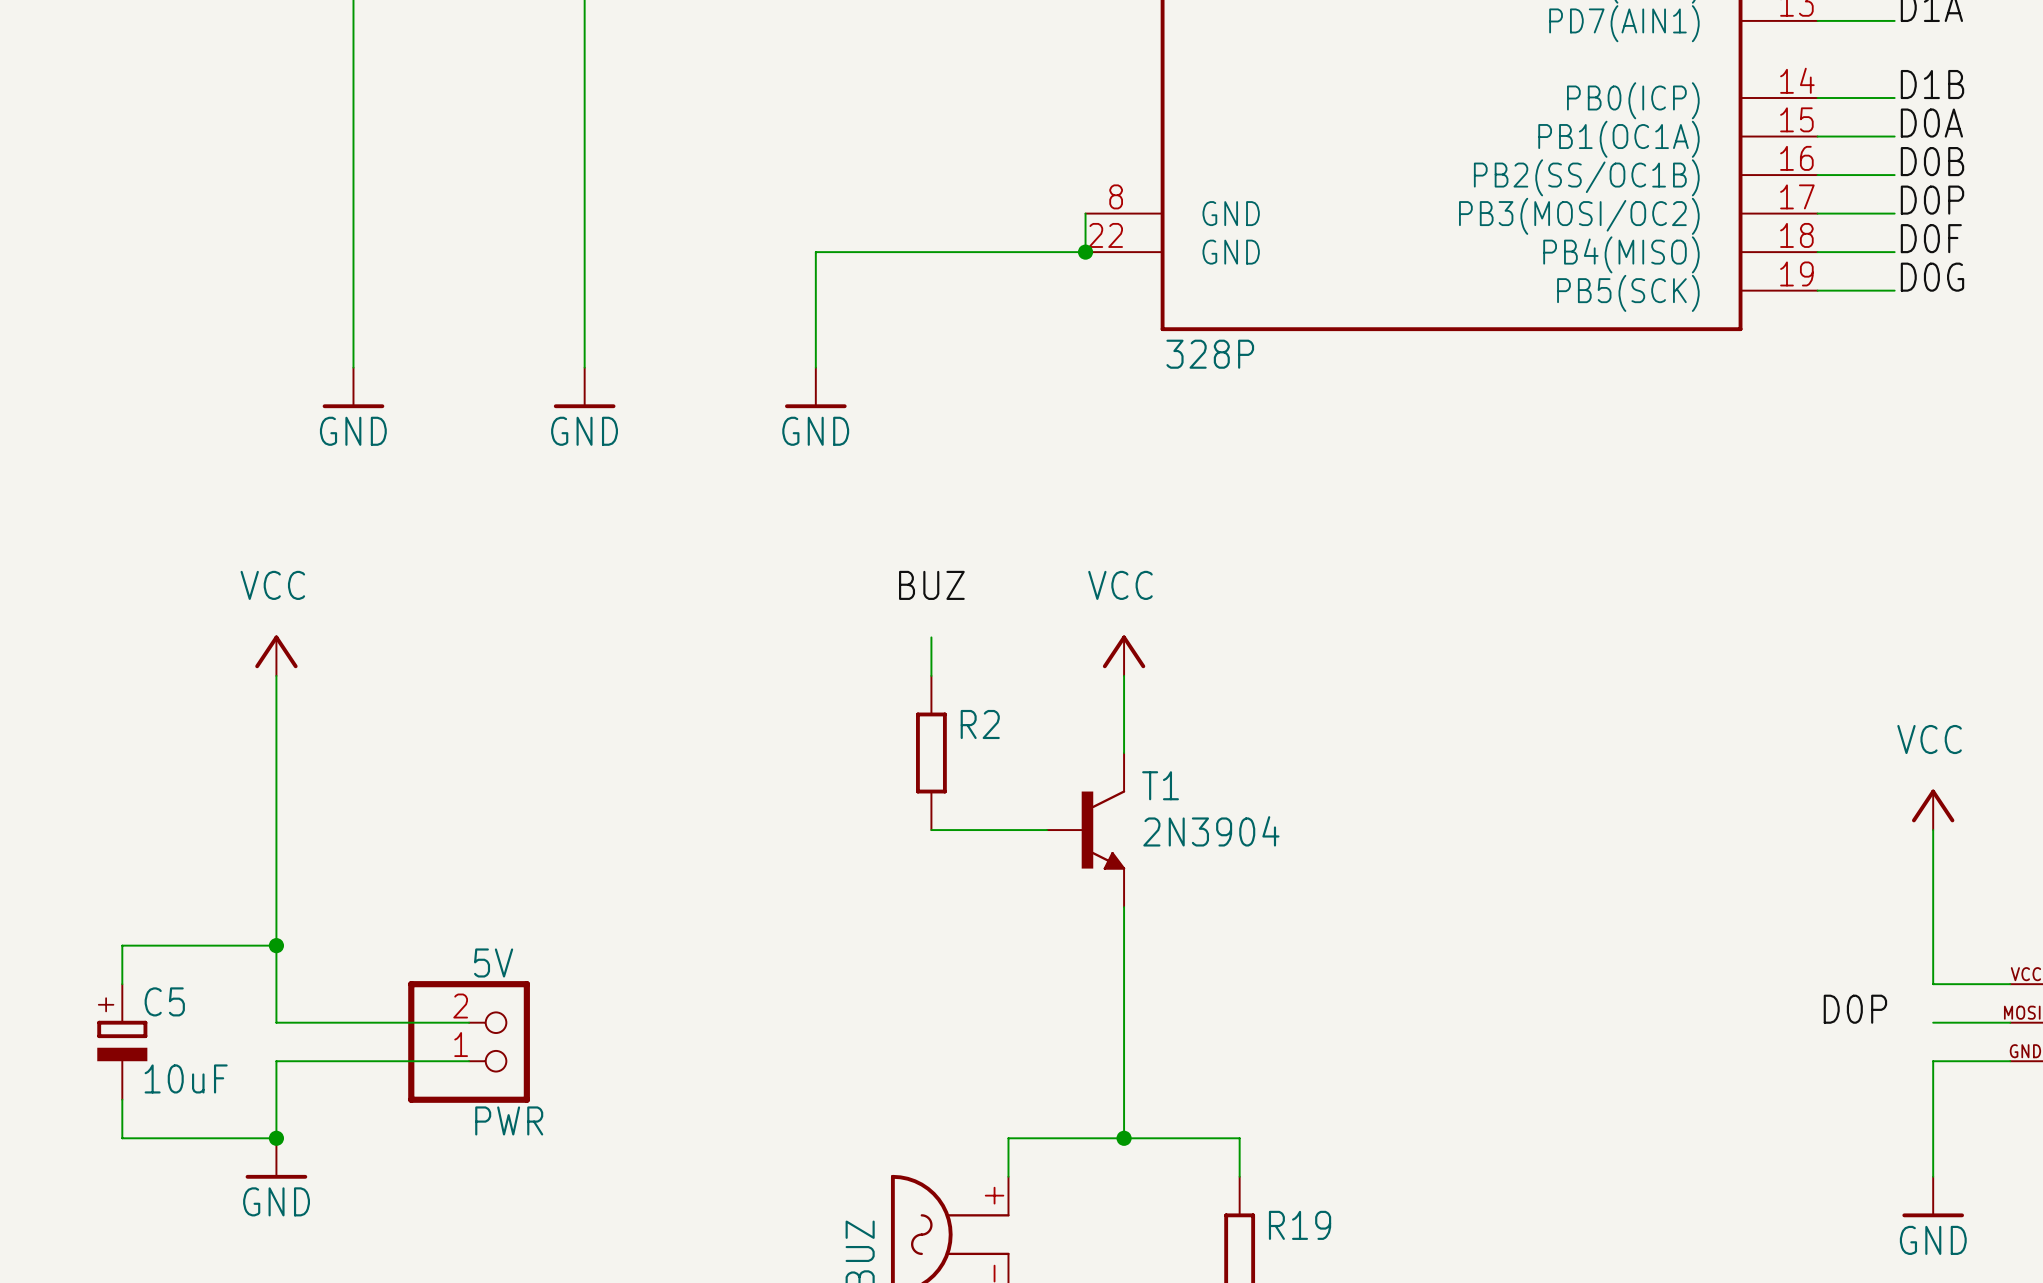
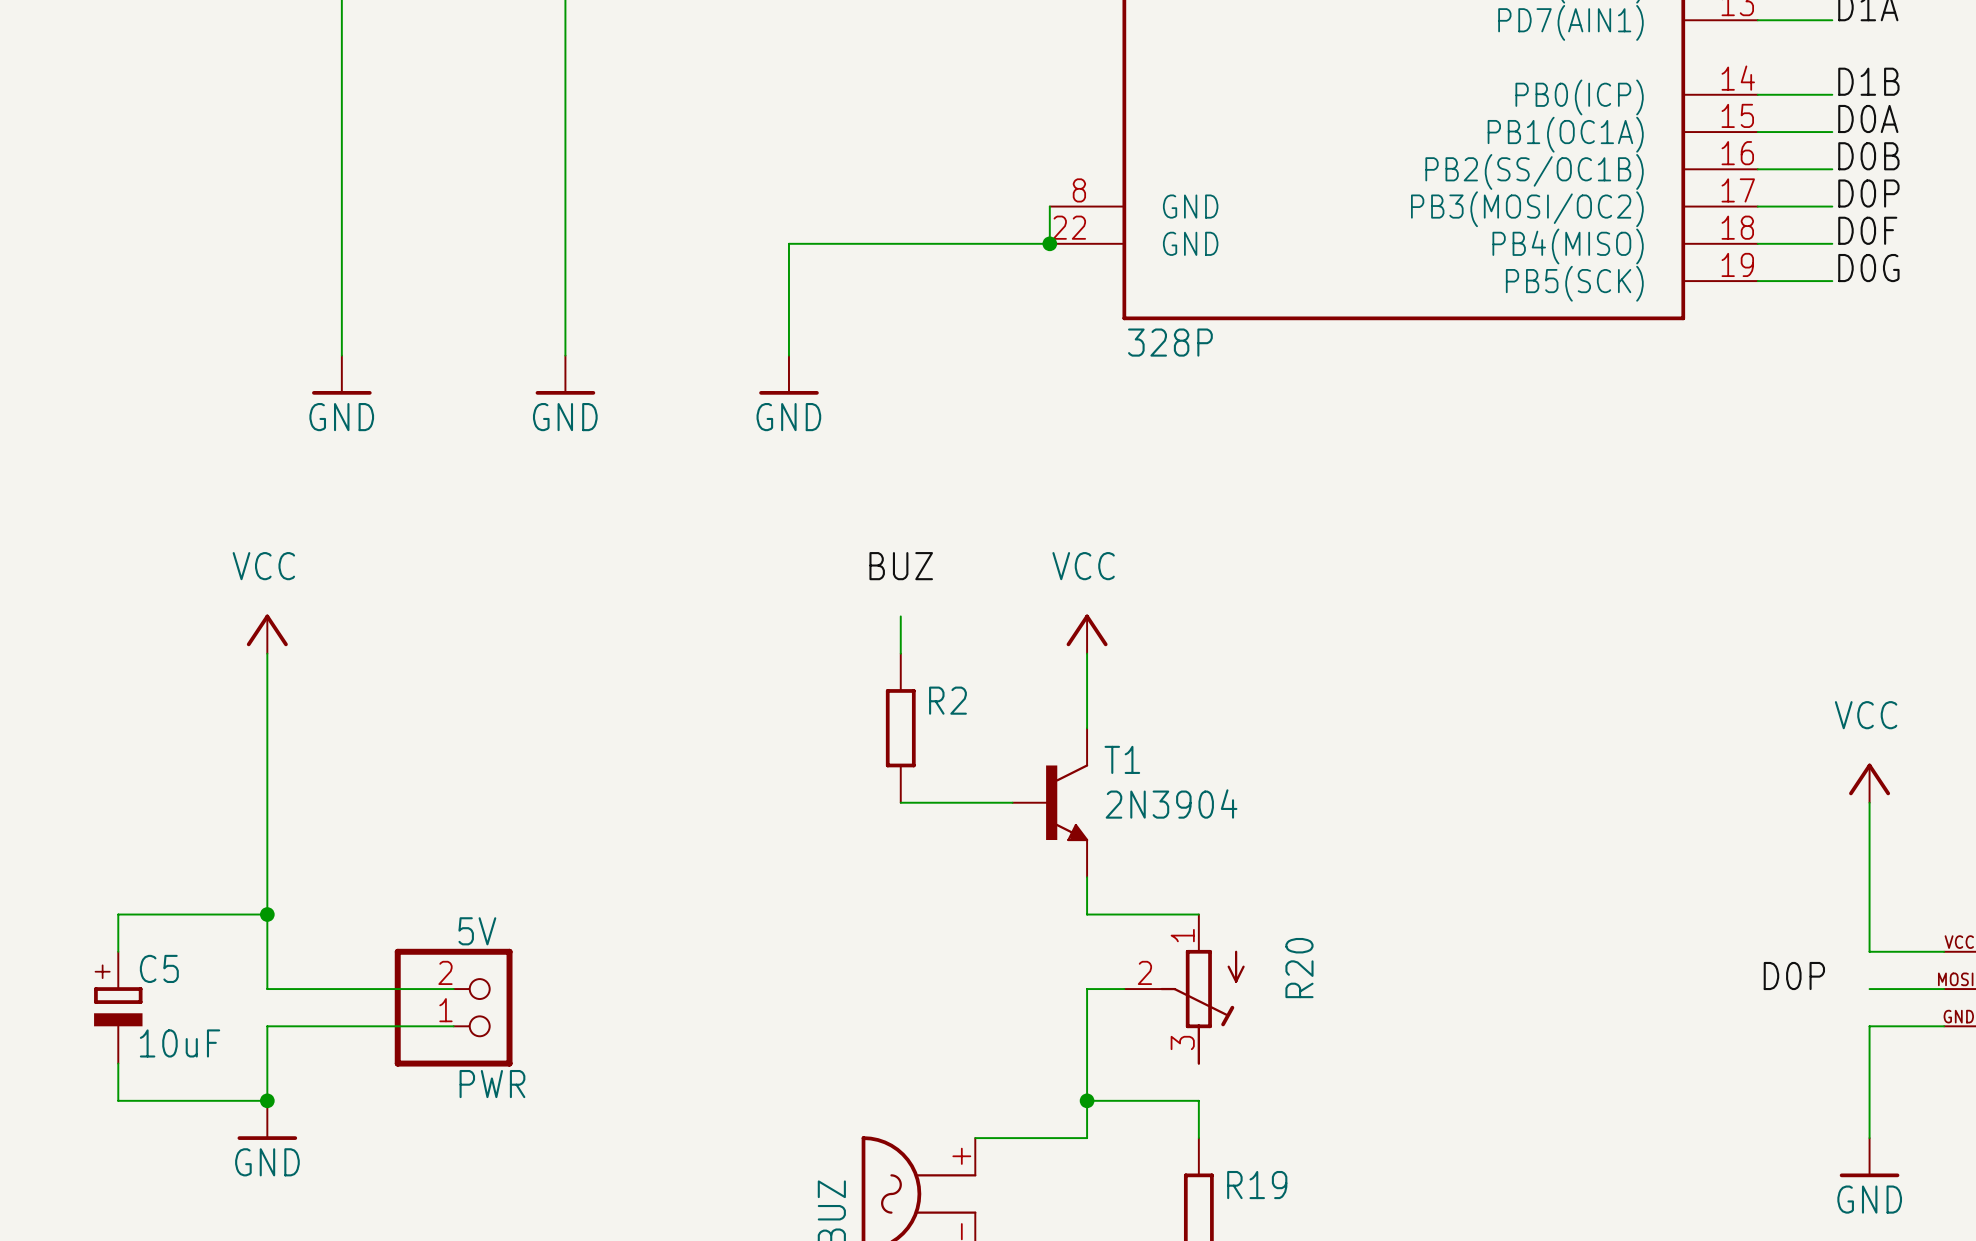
wire: (1124, 945) (1124, 1022) -> (1124, 989) (1087, 989)
wire: none -> (1087, 914) (1198, 914)
R20: none -> (1184, 989)
wire: (1124, 1138) (1008, 1138) (1008, 1176) -> (1087, 1100) (1087, 1138) (975, 1138)

